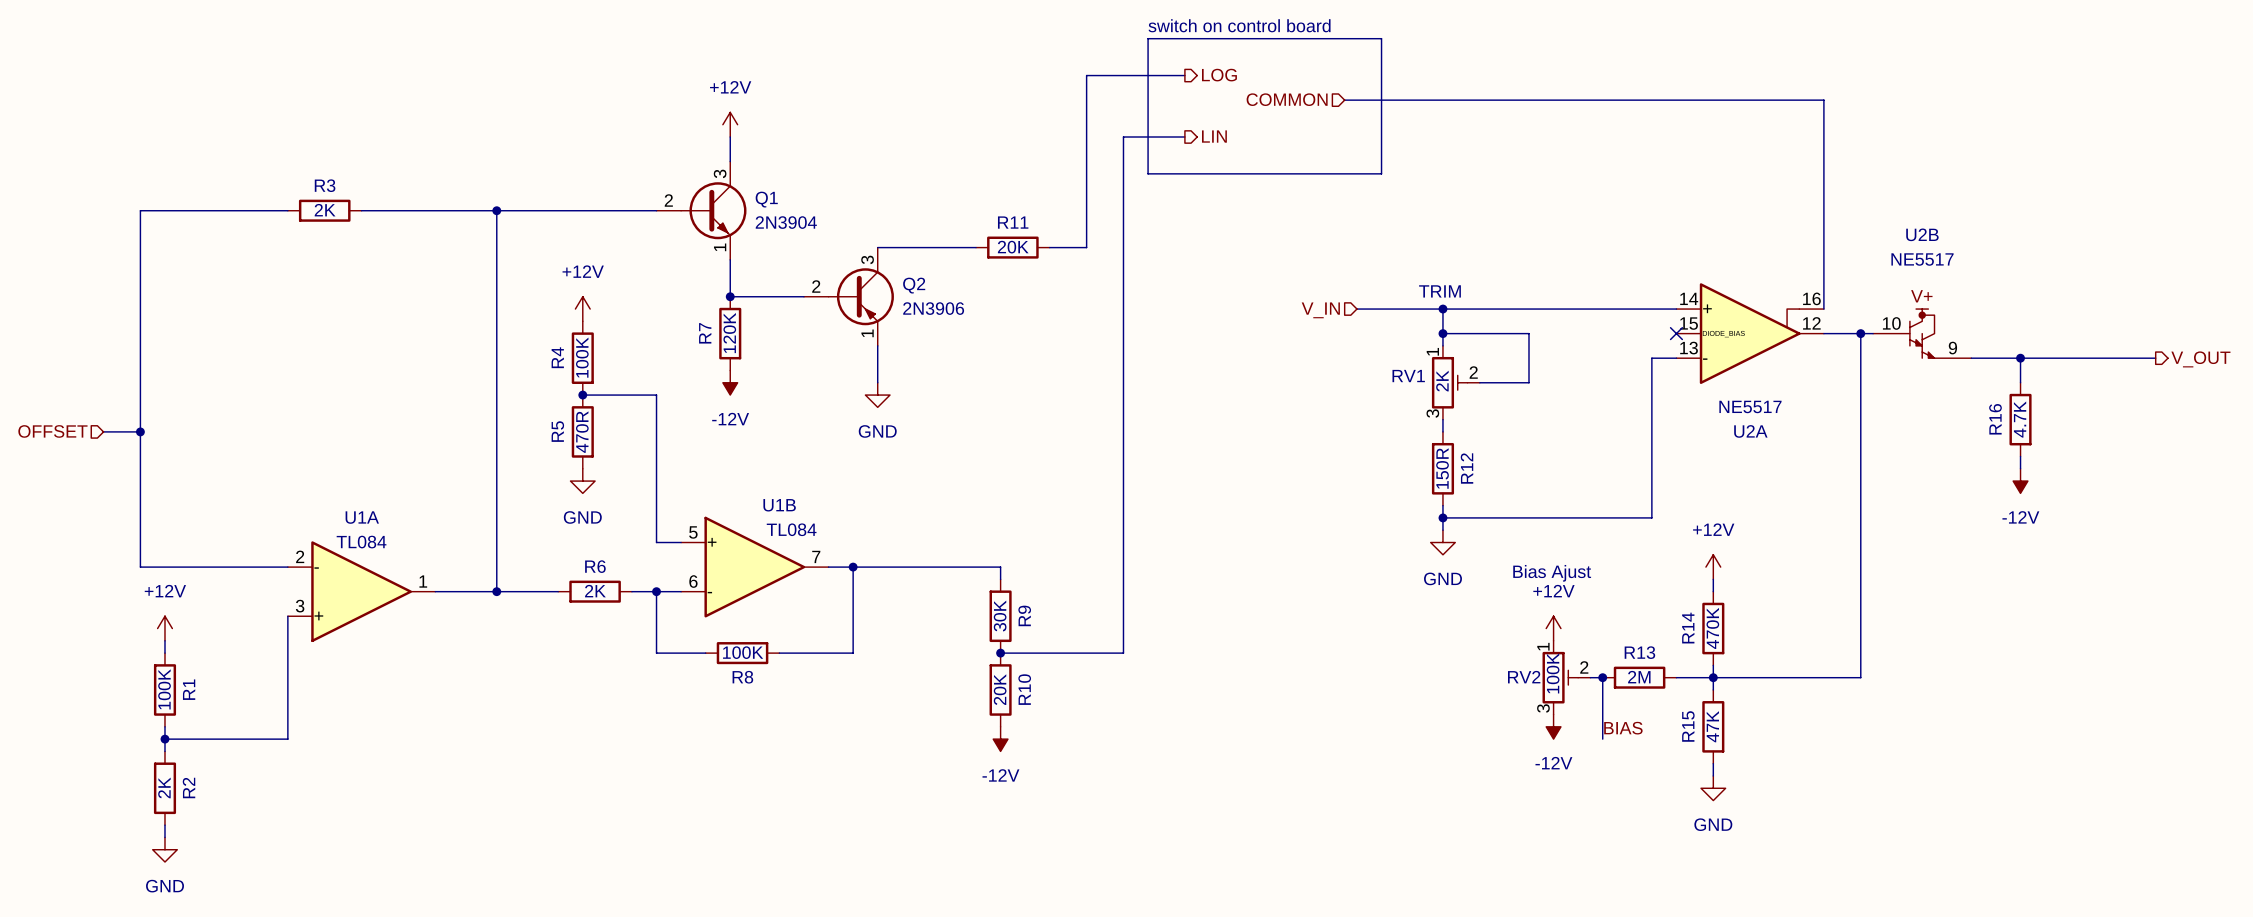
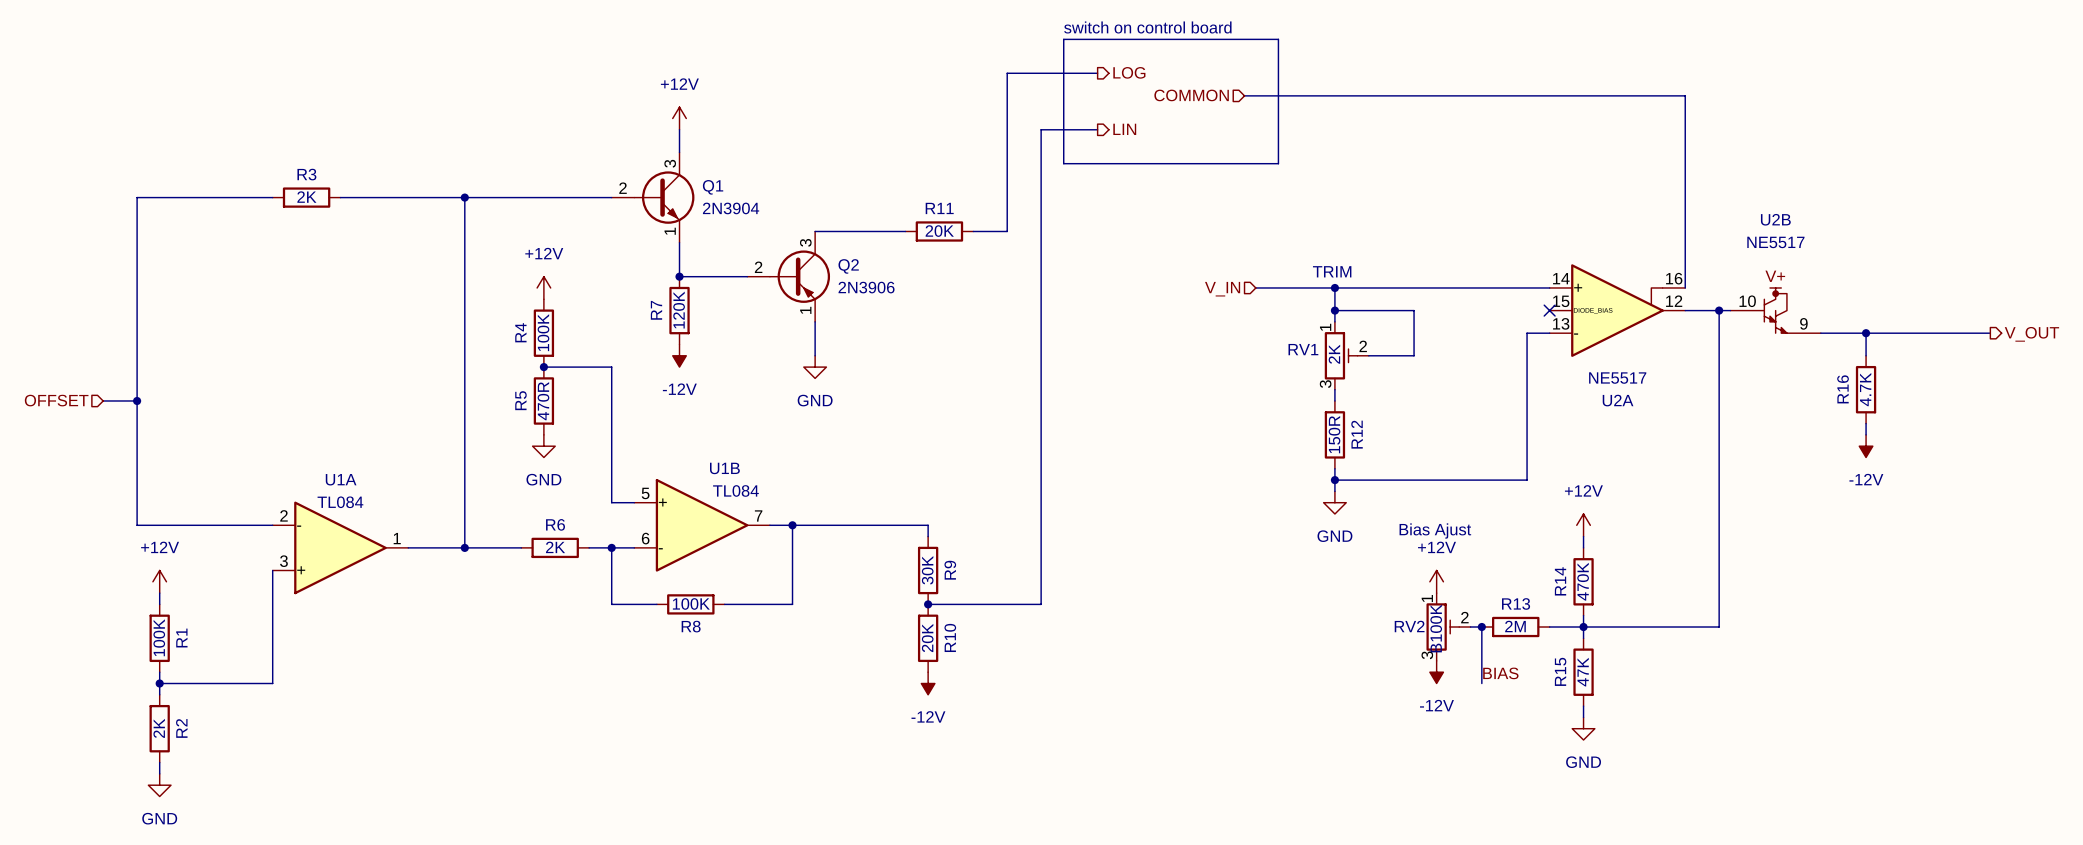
RV2 value: 100K (1553, 673) -> B100K (1436, 628)

